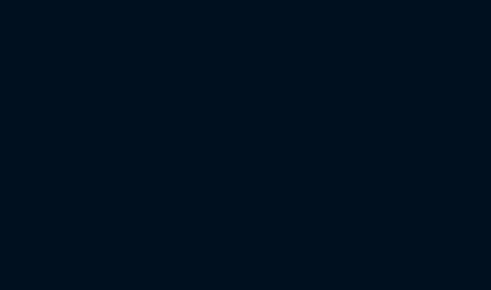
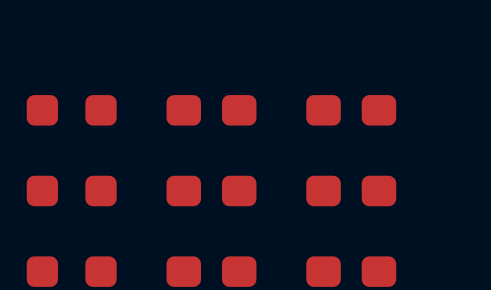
part: none -> (71, 110)
part: none -> (211, 110)
part: none -> (351, 110)
part: none -> (71, 190)
part: none -> (211, 190)
part: none -> (351, 190)
part: none -> (71, 271)
part: none -> (211, 271)
part: none -> (351, 271)

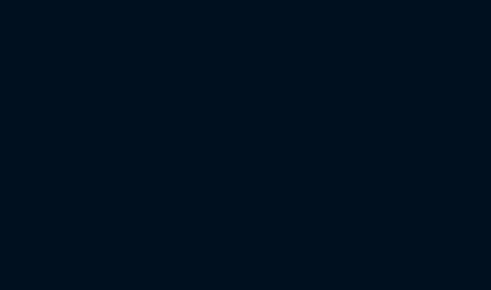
part: (71, 110) -> none
part: (211, 110) -> none
part: (351, 110) -> none
part: (71, 190) -> none
part: (211, 190) -> none
part: (351, 190) -> none
part: (71, 271) -> none
part: (211, 271) -> none
part: (351, 271) -> none

